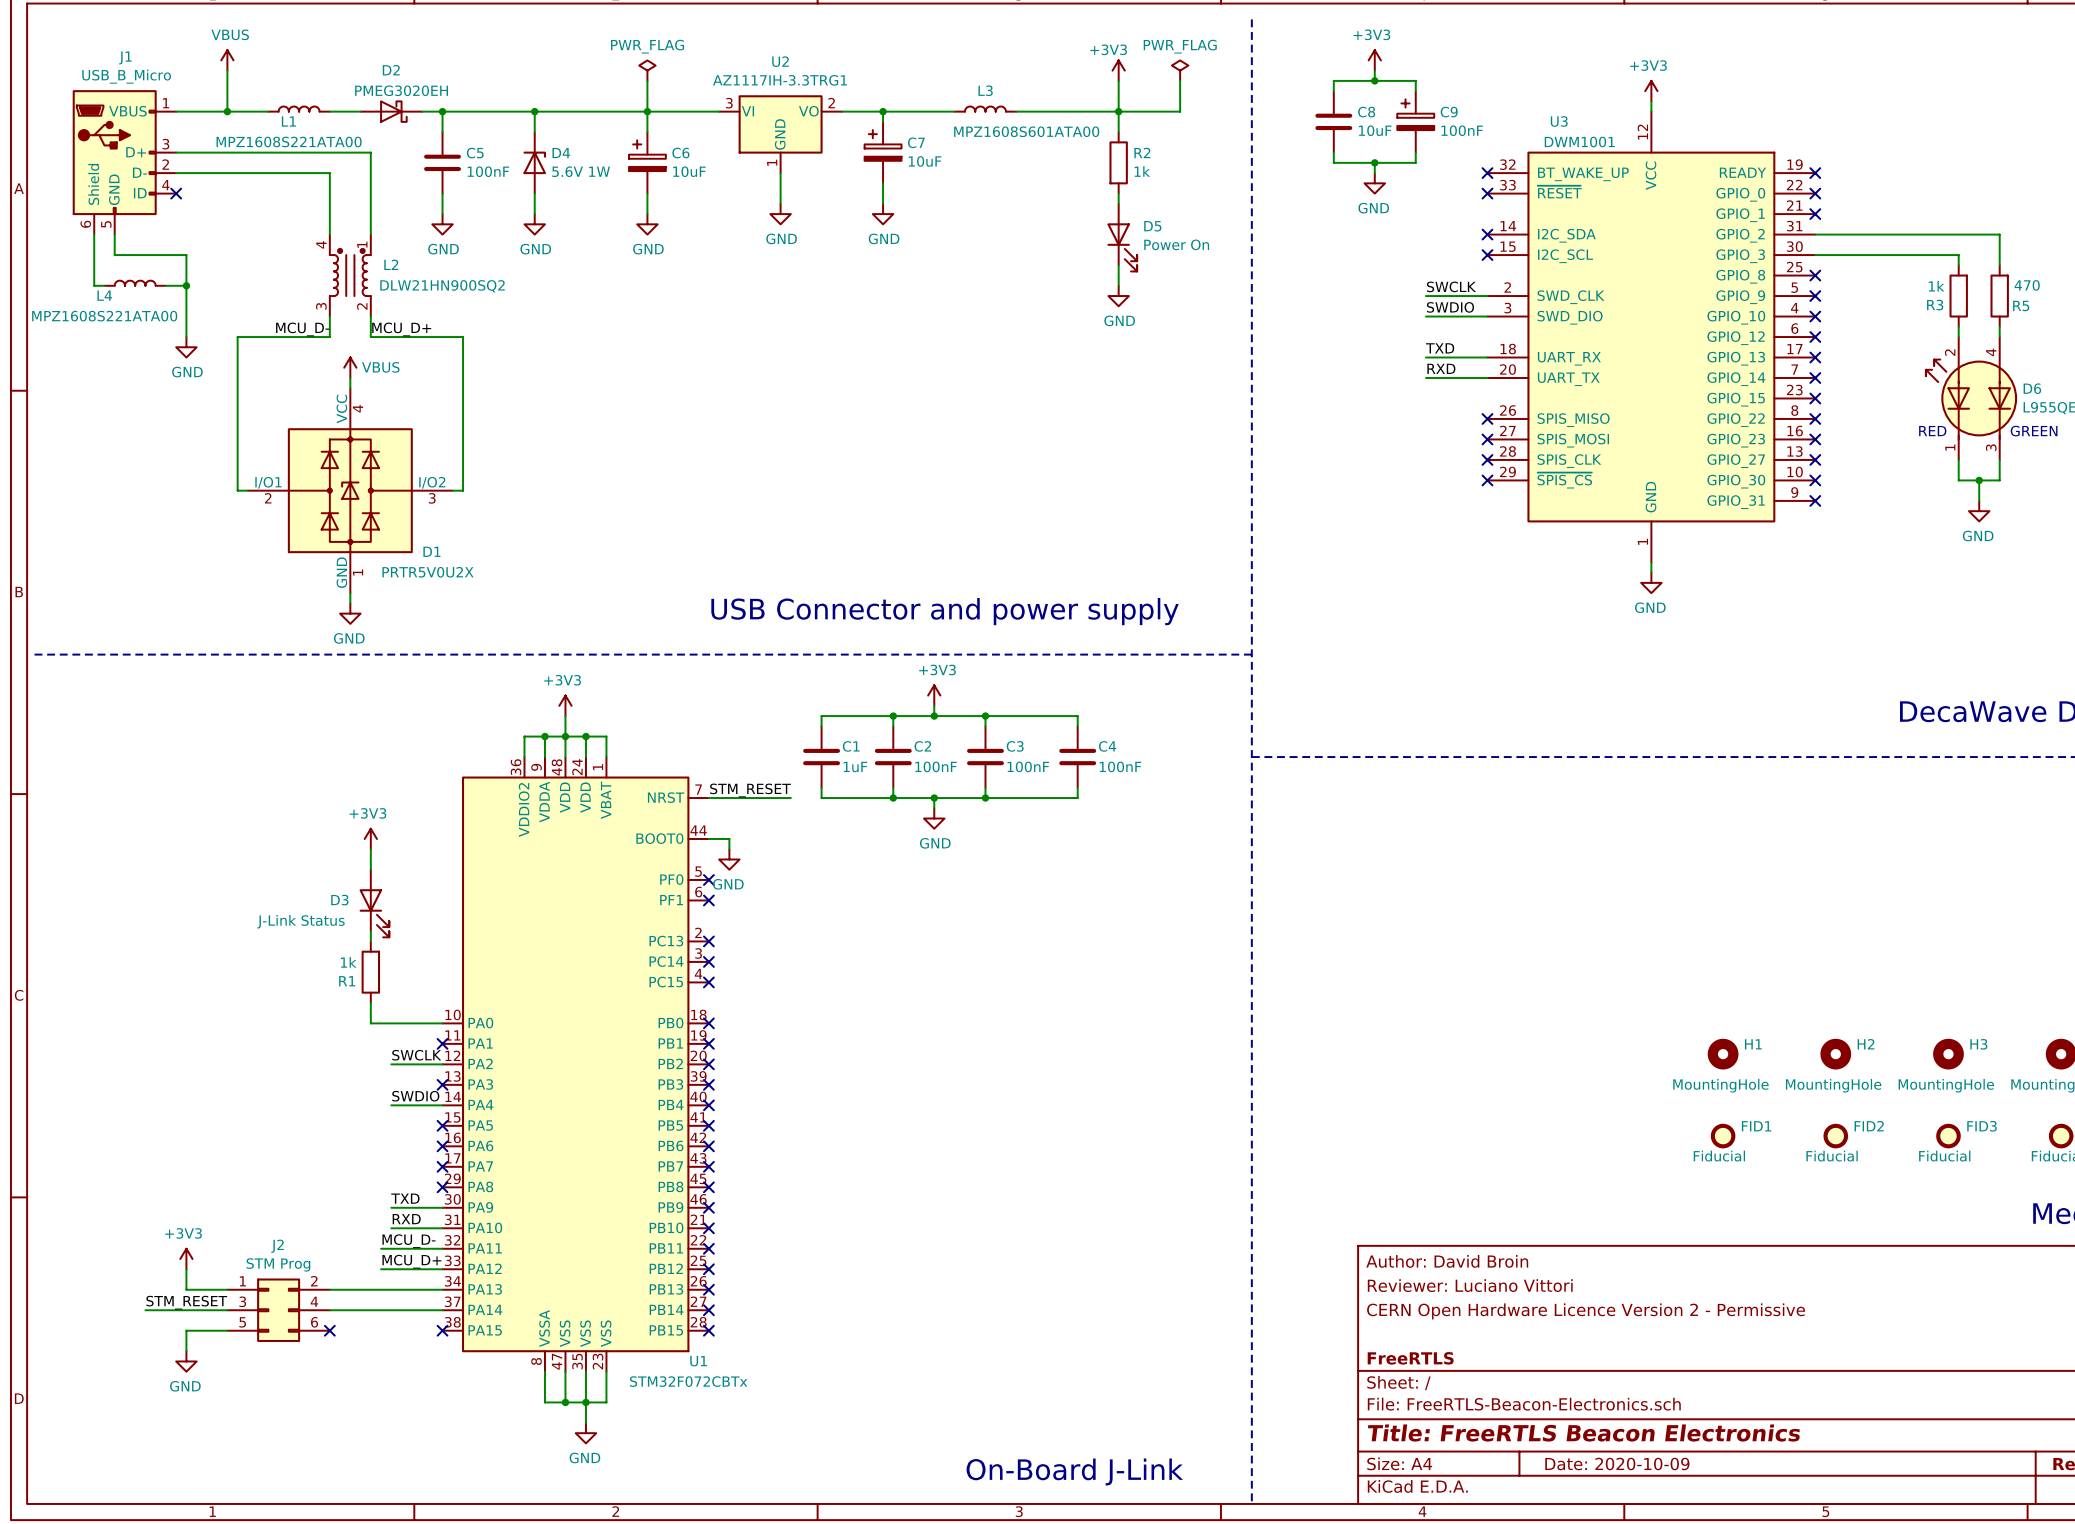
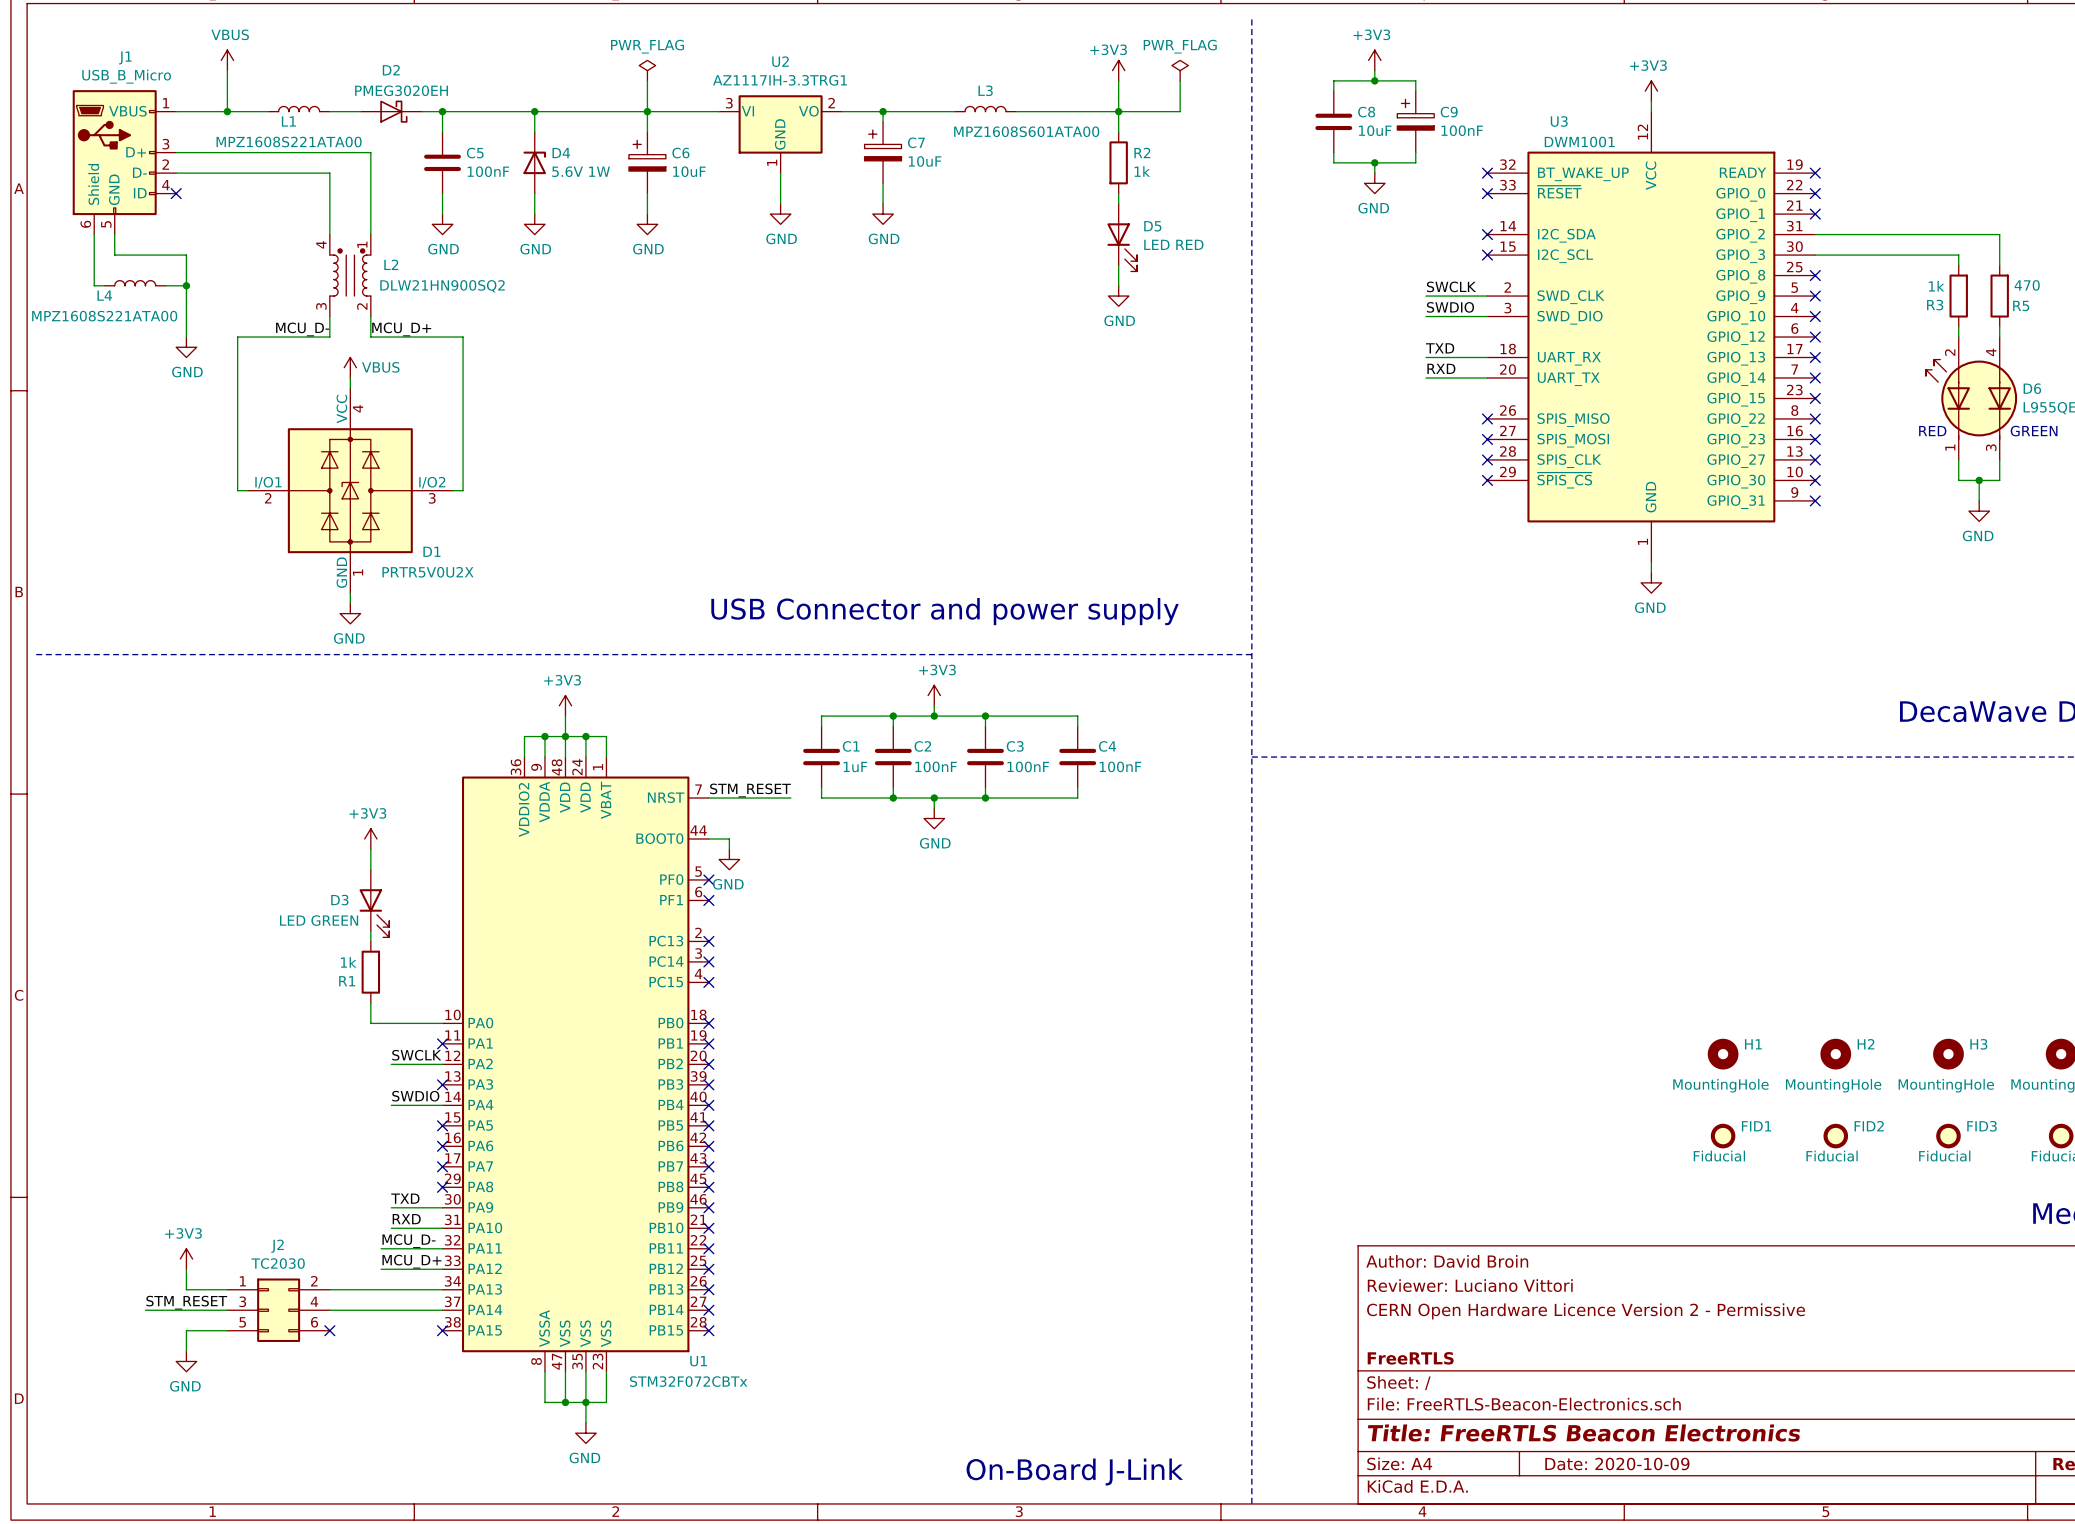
D5 value: Power On (1176, 244) -> LED RED (1173, 244)
D3 value: J-Link Status (301, 921) -> LED GREEN (319, 920)
J2 value: STM Prog (278, 1264) -> TC2030 (278, 1263)

